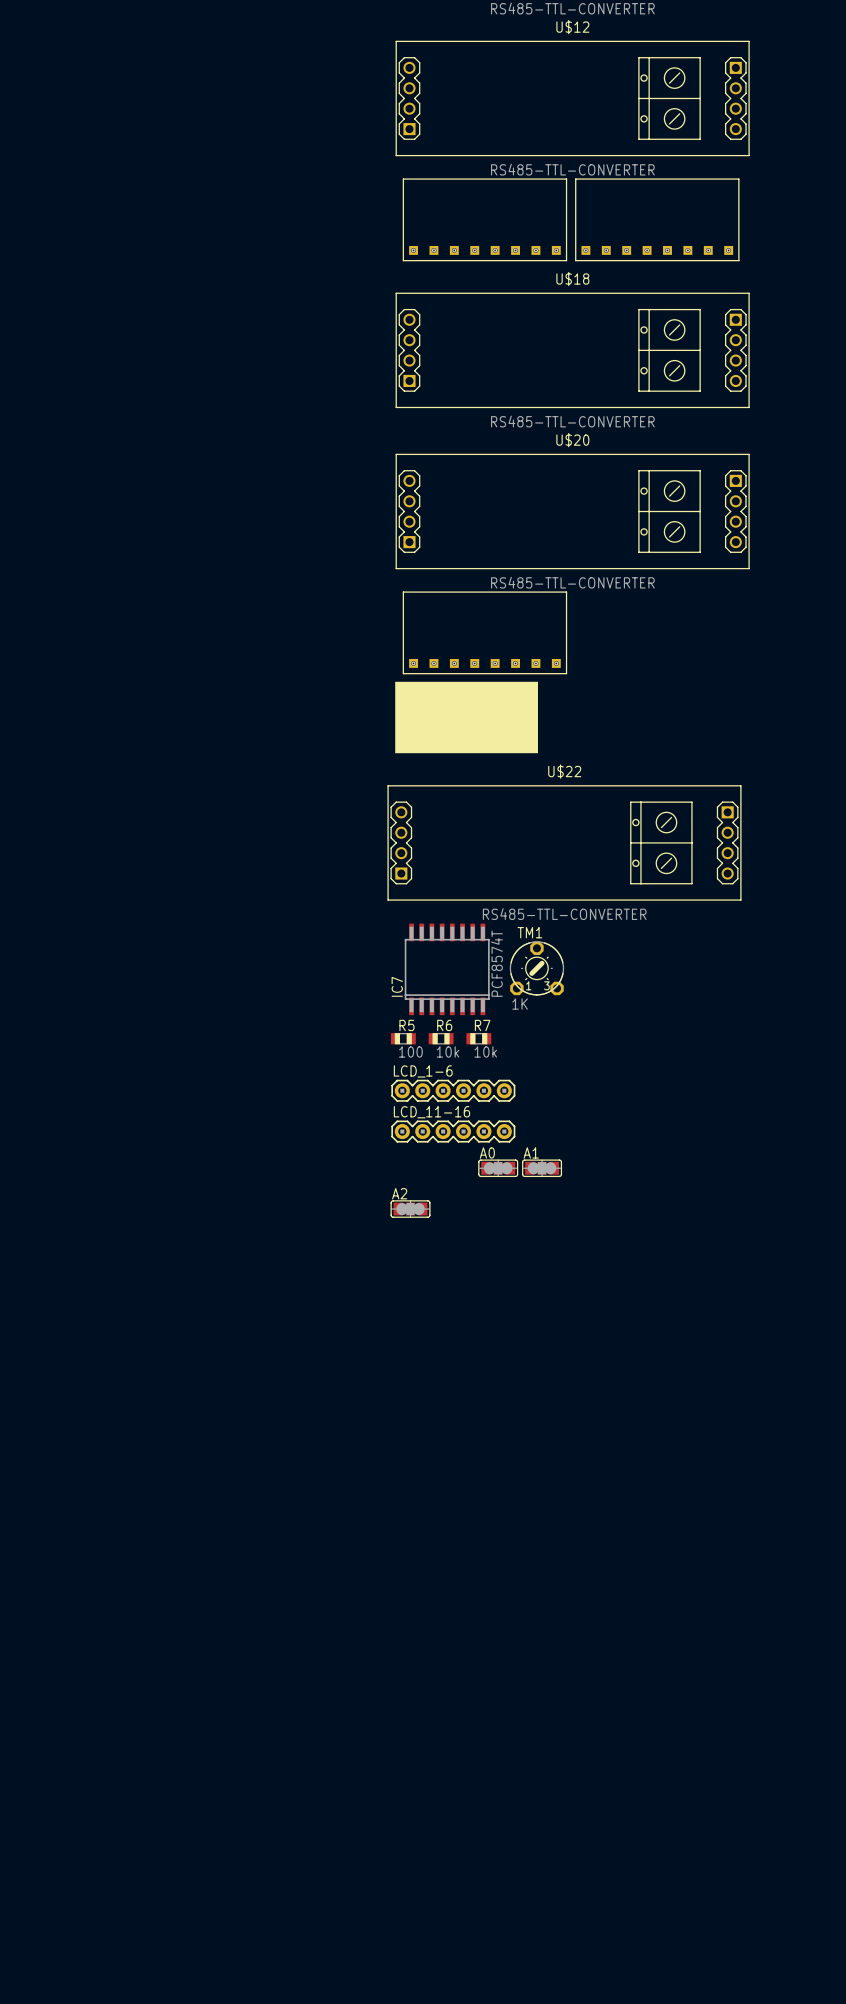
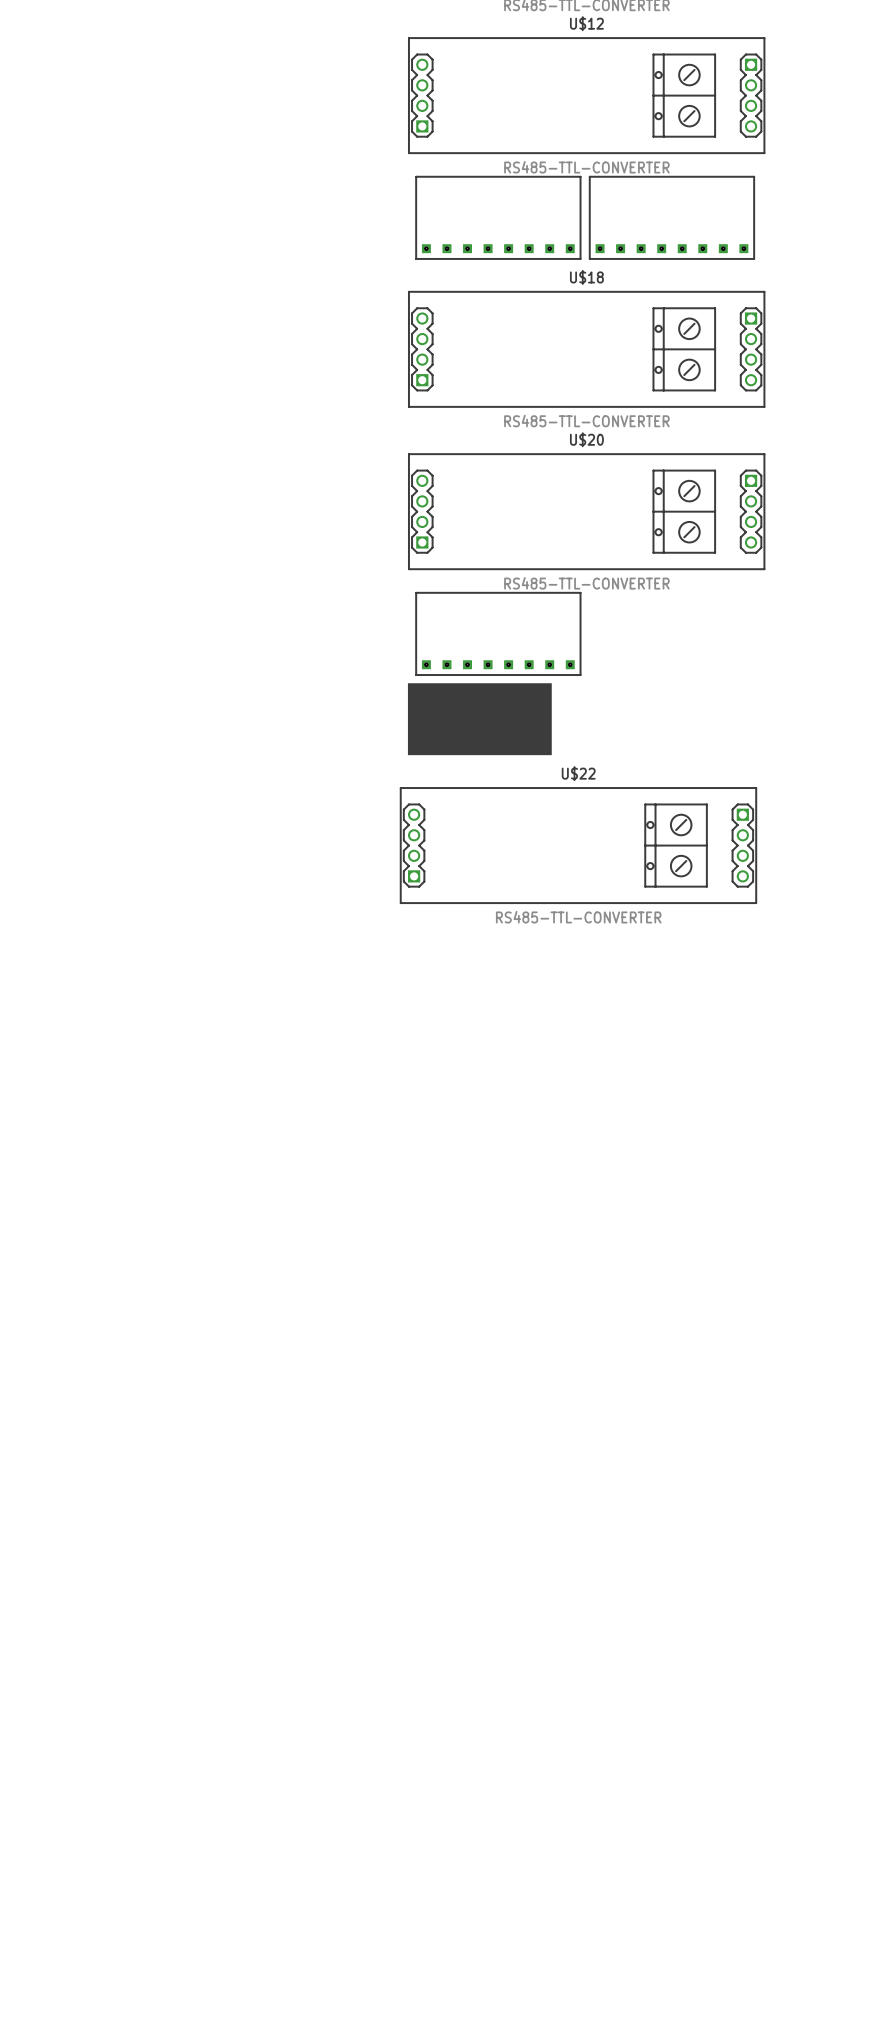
TM1: 1K (536, 968) -> none
IC7: PCF8574T (447, 969) -> none
R5: 100 (403, 1038) -> none
R6: 10k (441, 1038) -> none
R7: 10k (478, 1038) -> none
LCD_1-6: (453, 1090) -> none
LCD_11-16: (453, 1131) -> none
A0: (498, 1168) -> none
A1: (542, 1168) -> none
A2: (410, 1209) -> none

